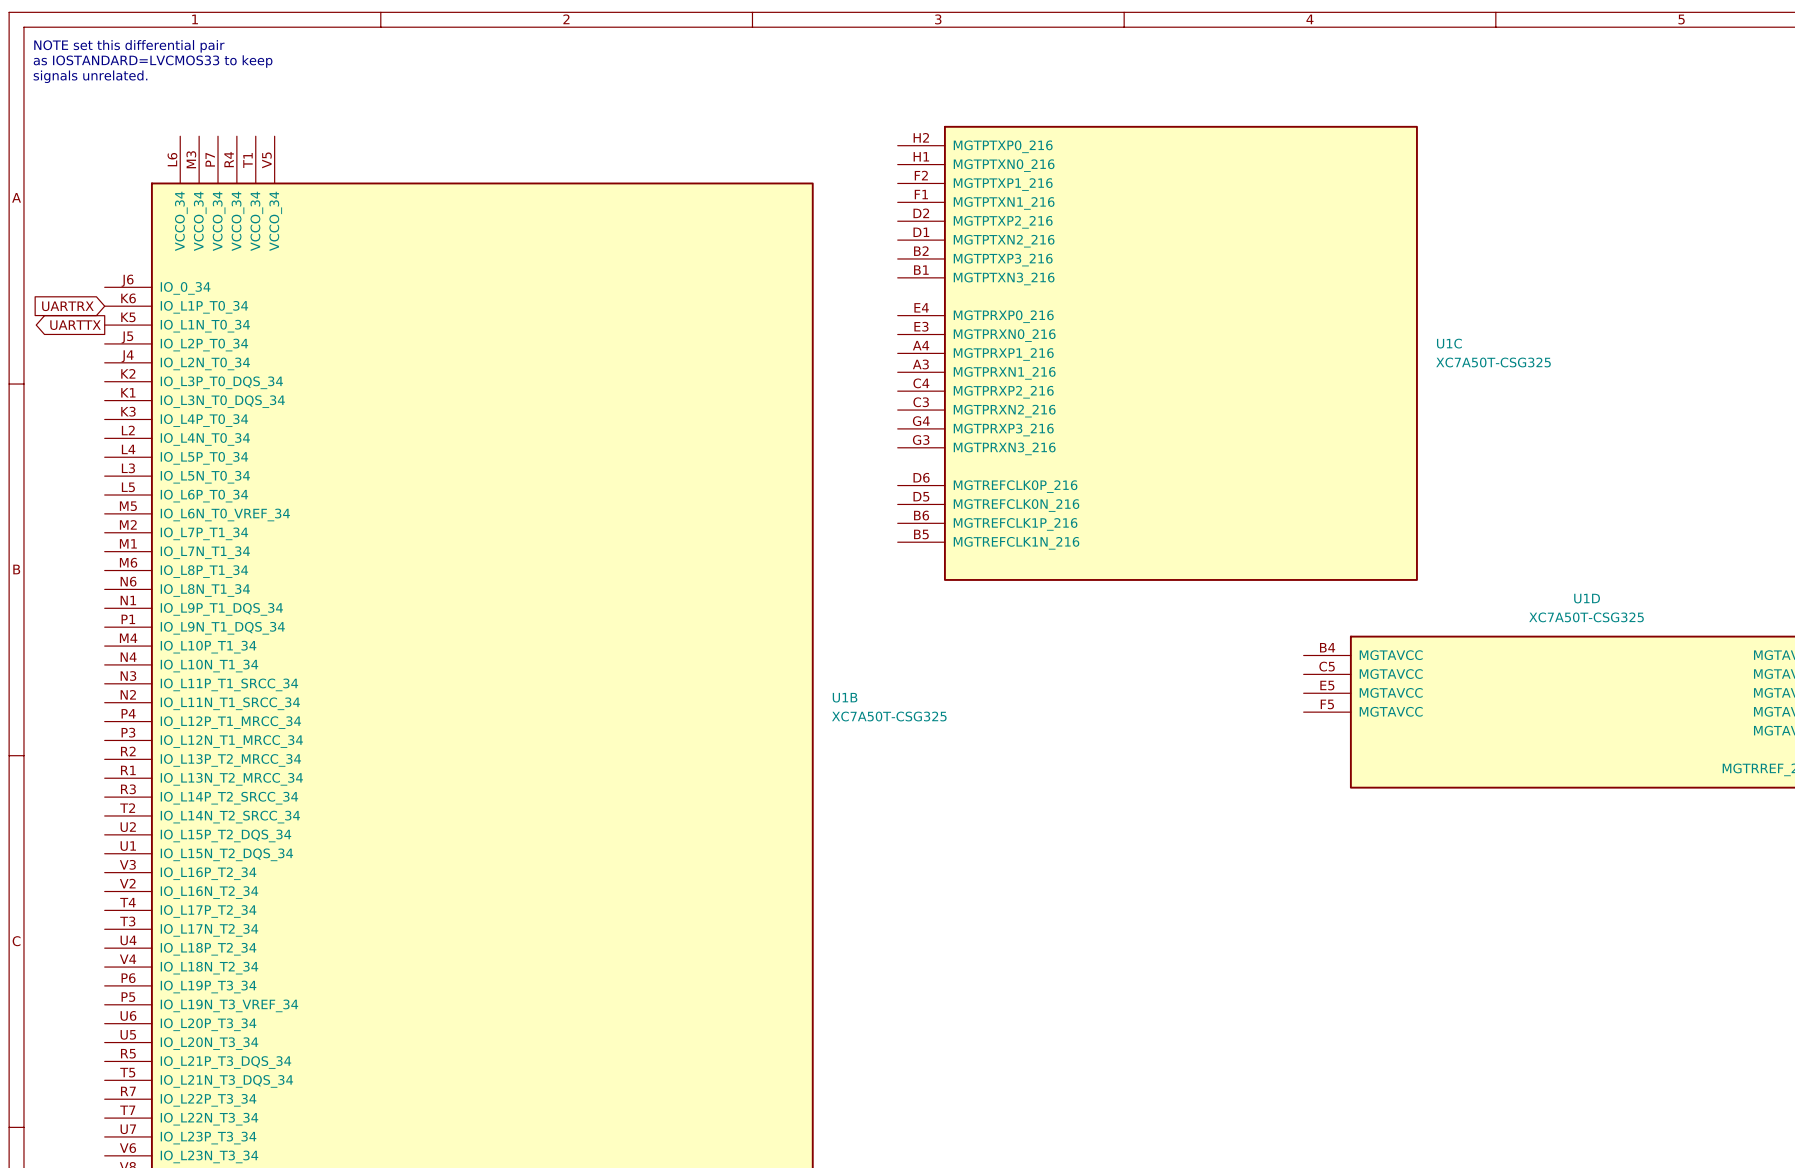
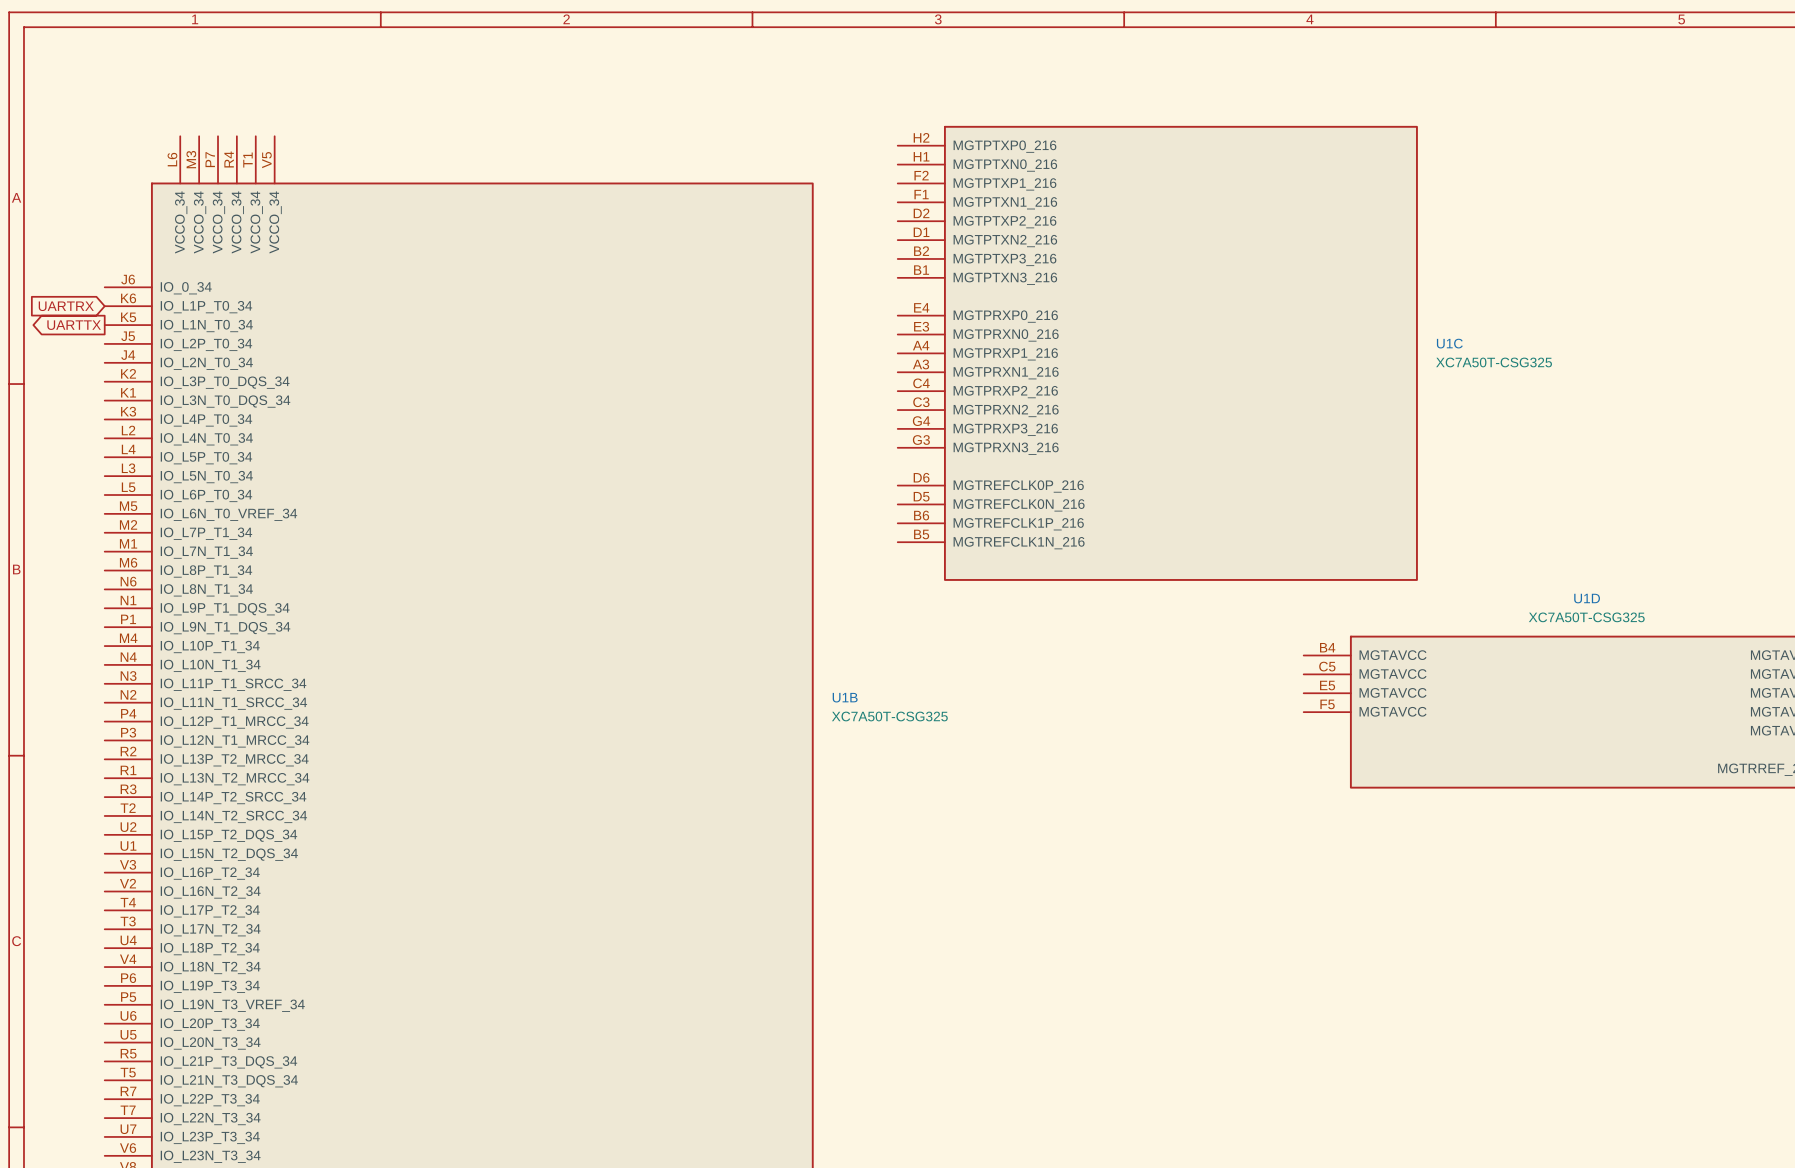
text: NOTE set this differential pair (129, 46) -> none
text: as IOSTANDARD=LVCMOS33 to keep (153, 61) -> none
text: signals unrelated. (90, 76) -> none

